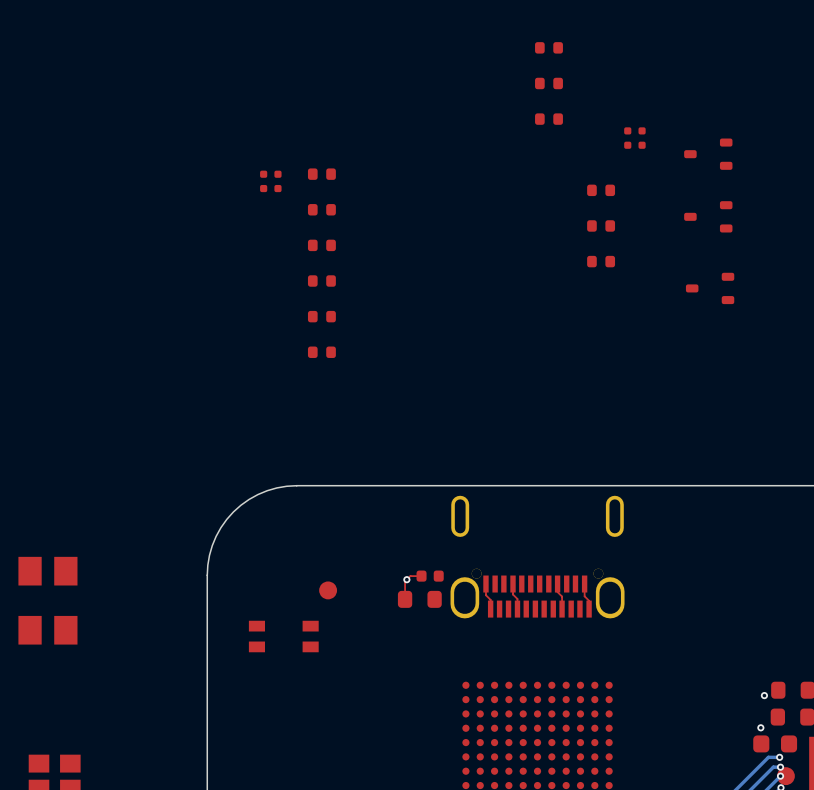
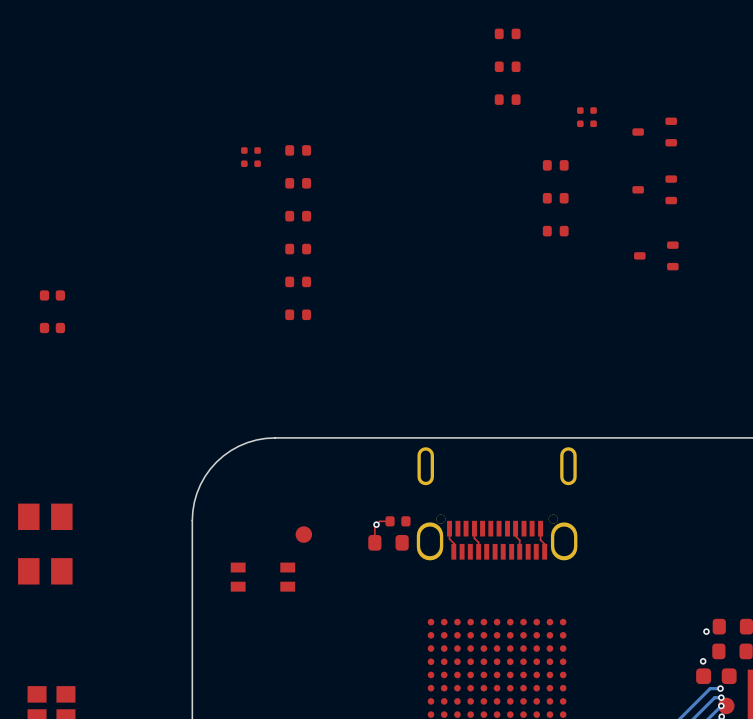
part: none -> (52, 295)
part: none -> (52, 328)

